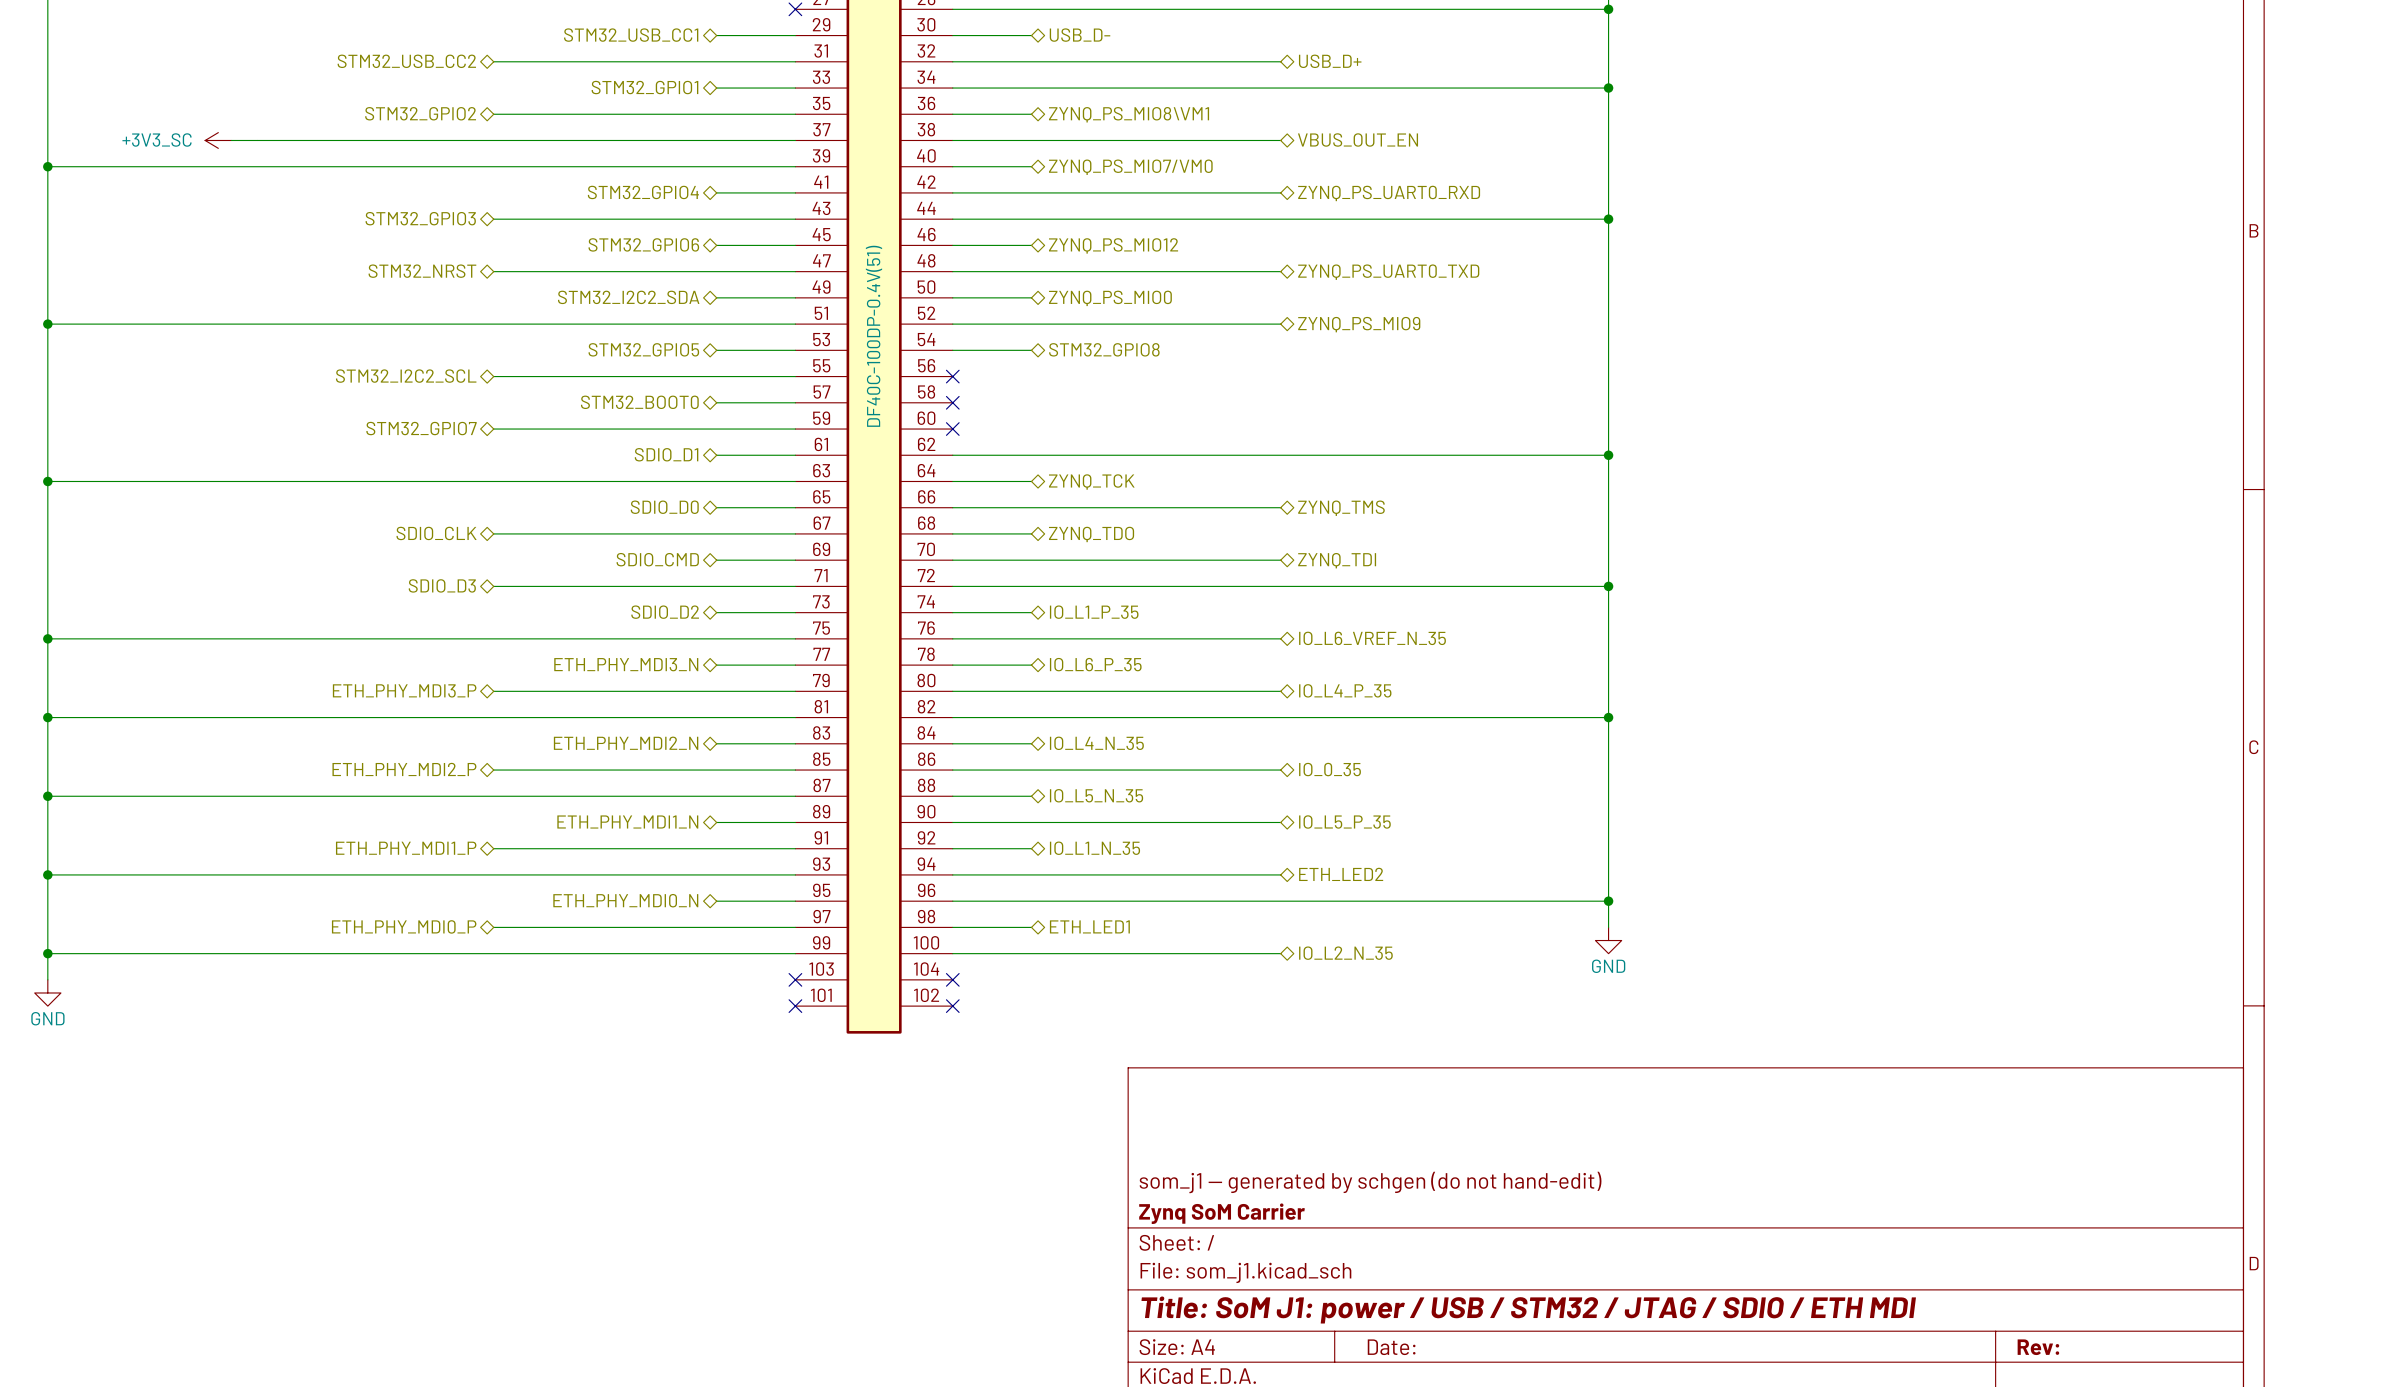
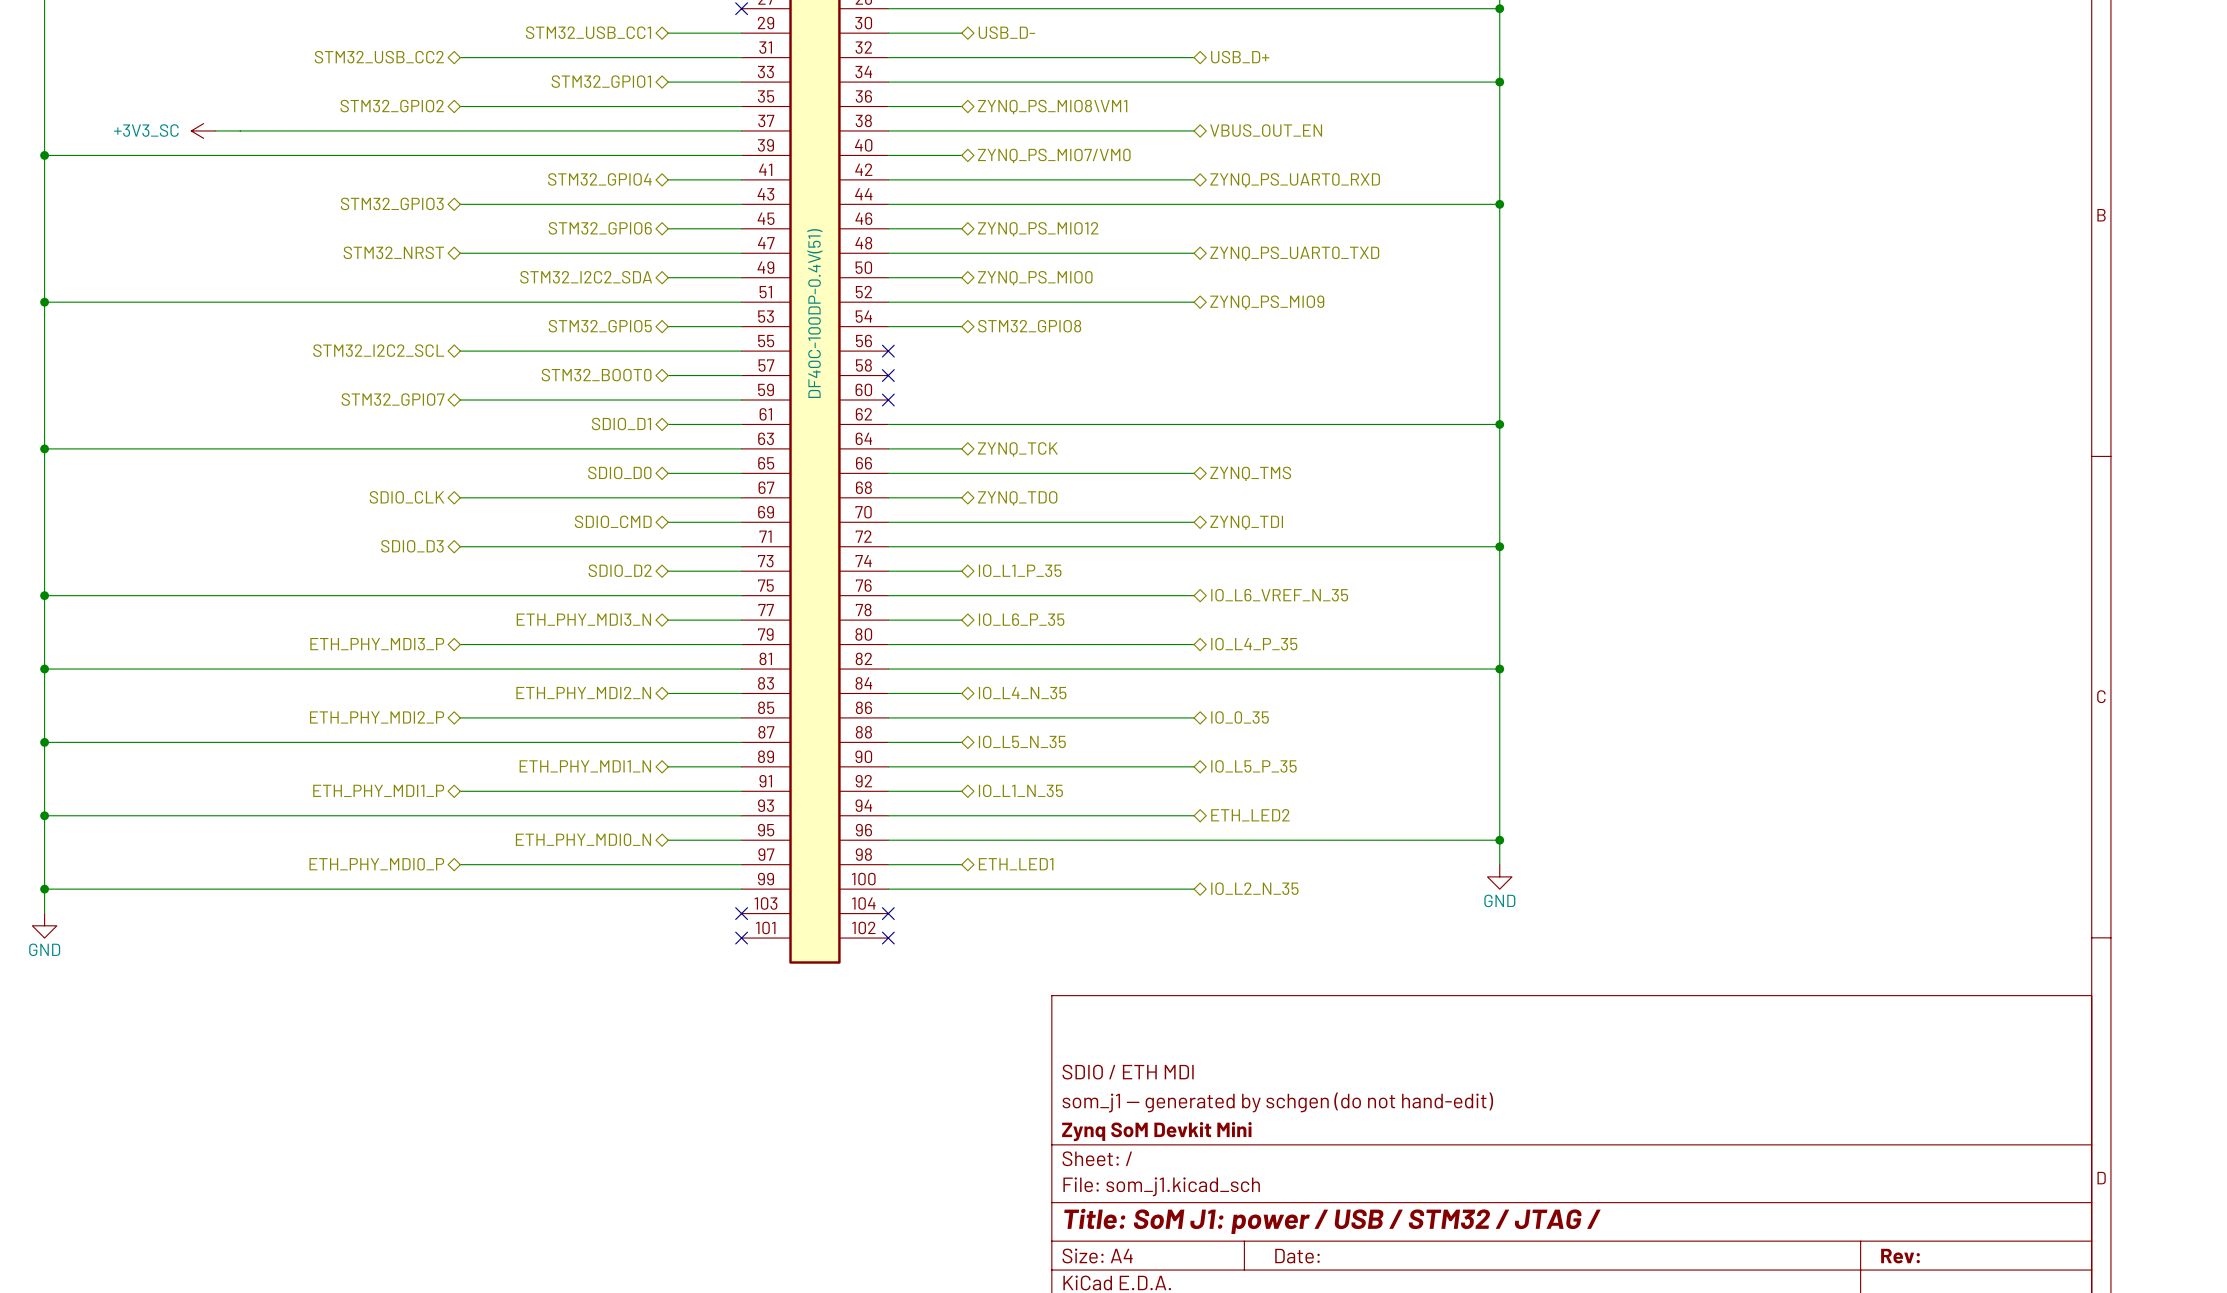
title block: none -> SDIO / ETH MDI (1128, 1072)
title block: Zynq SoM Carrier (1222, 1213) -> Zynq SoM Devkit Mini (1156, 1131)
title block: Title: SoM J1: power / USB / STM32 / JTAG / SDIO / ETH MDI (1528, 1310) -> Title: SoM J1: power / USB / STM32 / JTAG / (1332, 1221)

